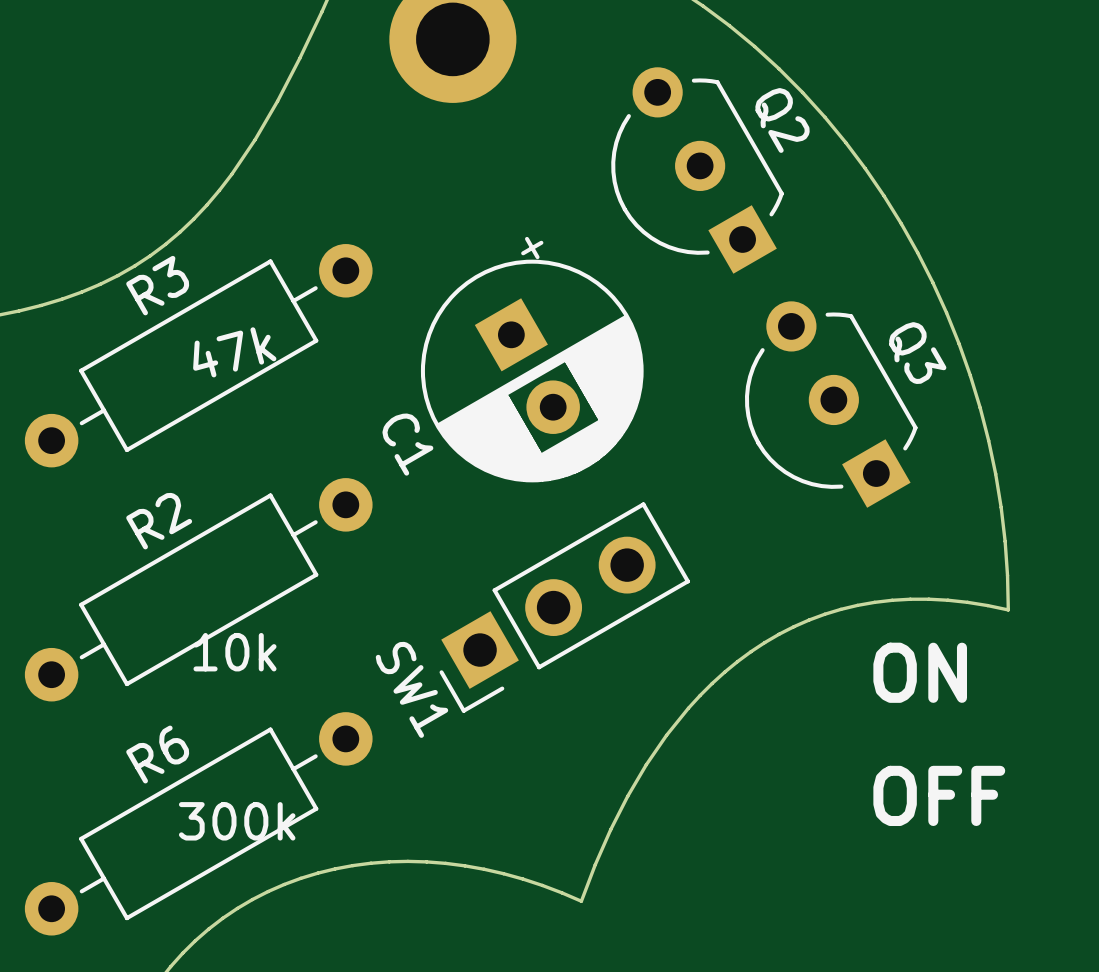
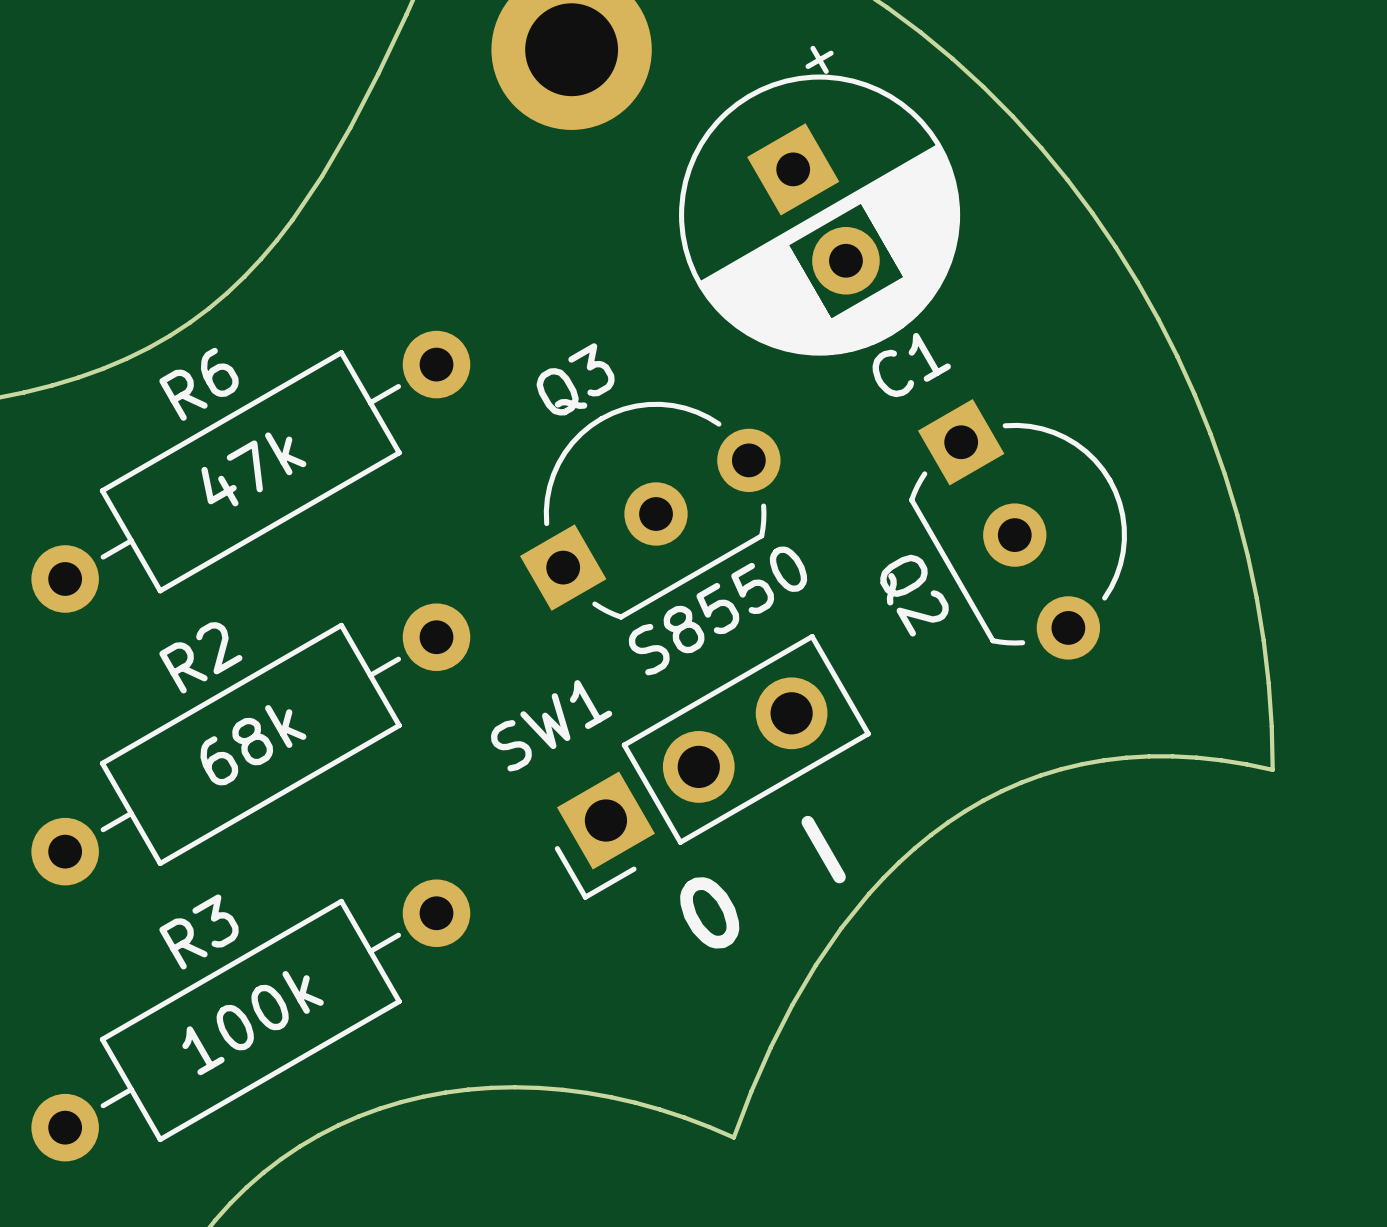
Q2 rotation: 0° (697, 170) -> 180° (1018, 529)
Q2 position: (697, 170) -> (1018, 529)
text rotation: 0° (234, 352) -> 15° counterclockwise (253, 469)
Q3 name position: Q3 (917, 353) -> Q3 (575, 379)
R3 position: (198, 355) -> (250, 1020)
C1 position: (532, 359) -> (819, 200)
Q3 rotation: 0° (831, 404) -> 90° clockwise (650, 510)
Q3 position: (831, 404) -> (650, 510)
C1 name rotation: 0° (407, 444) -> 90° counterclockwise (911, 365)
C1 name position: C1 (407, 444) -> C1 (911, 365)
text: none -> S8550 (717, 610)
text: none -> 68k (253, 745)
text: 10k (234, 652) -> none
text: ON (920, 672) -> none
text: none -> I (823, 849)
SW1 name rotation: 0° (411, 689) -> 90° counterclockwise (551, 725)
text: none -> 0 (709, 912)
text: OFF (939, 795) -> none
text: 300k (237, 821) -> 100k (253, 1023)
R6 position: (198, 823) -> (250, 471)

